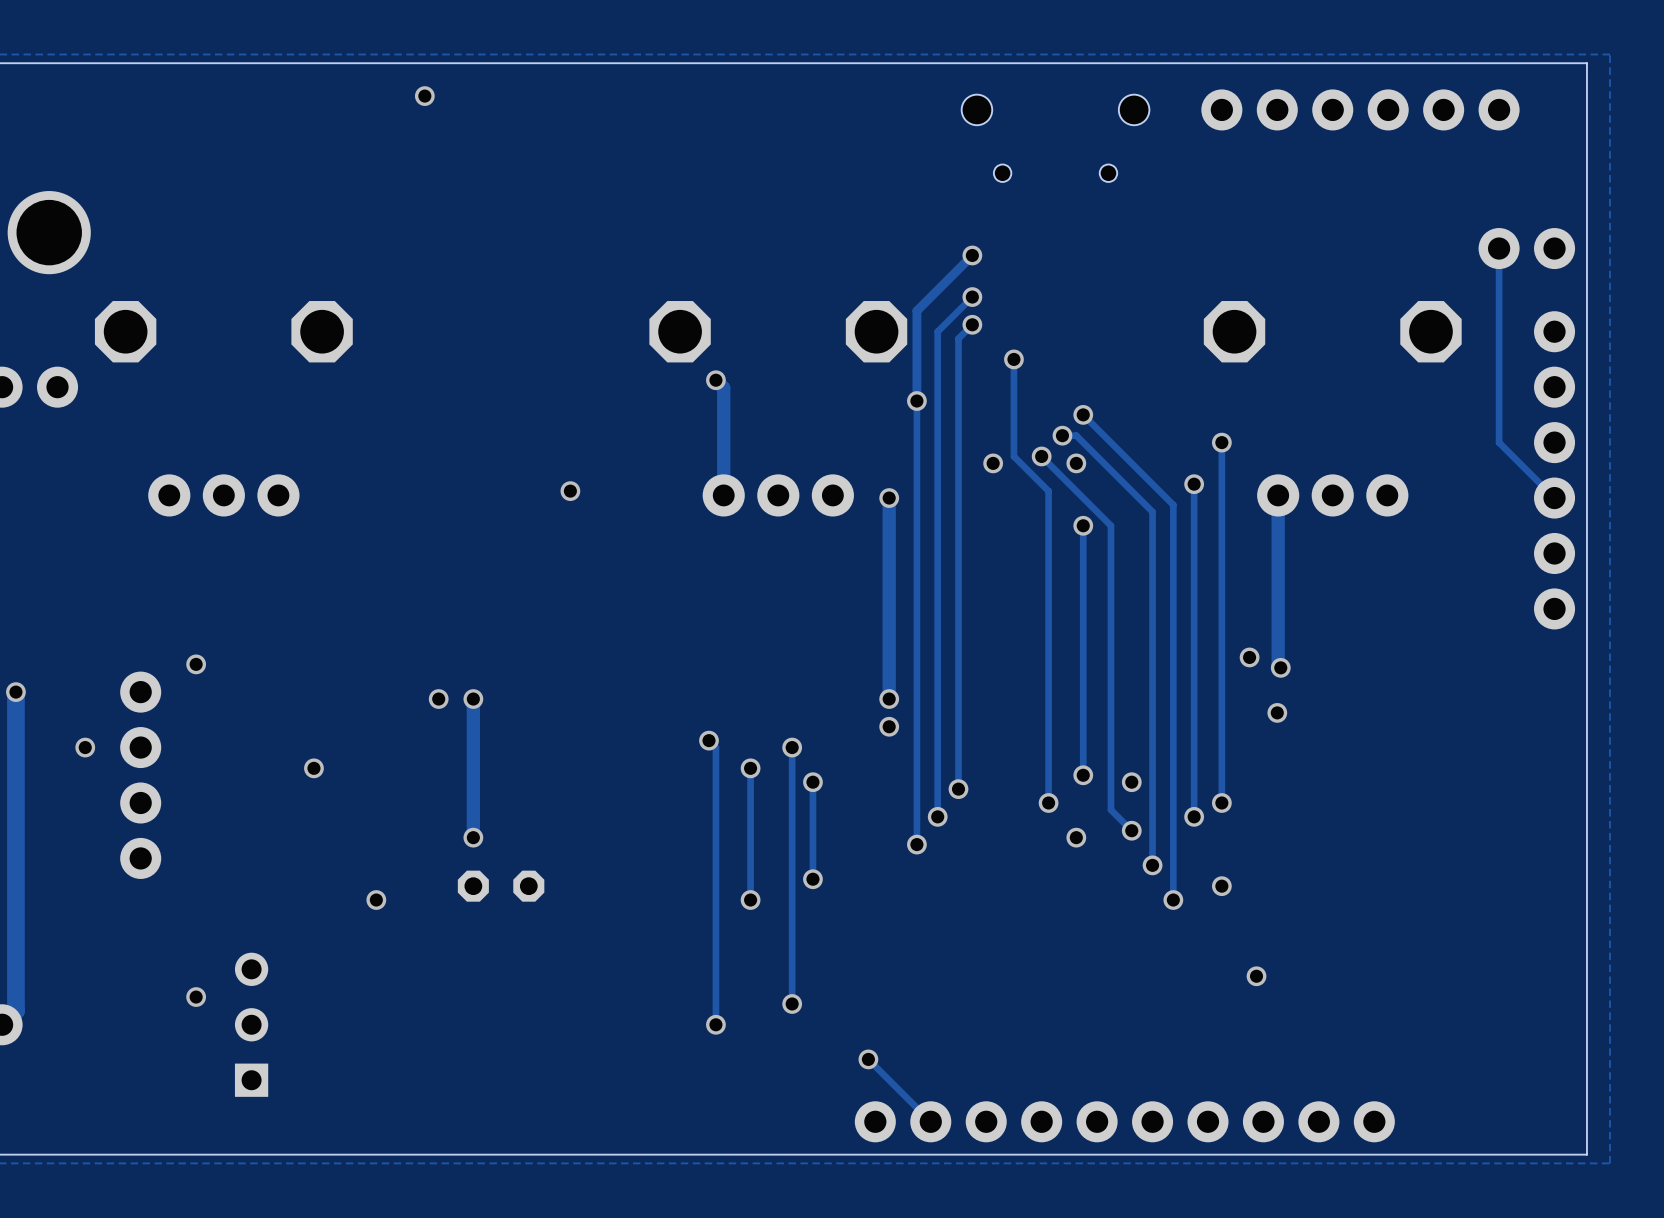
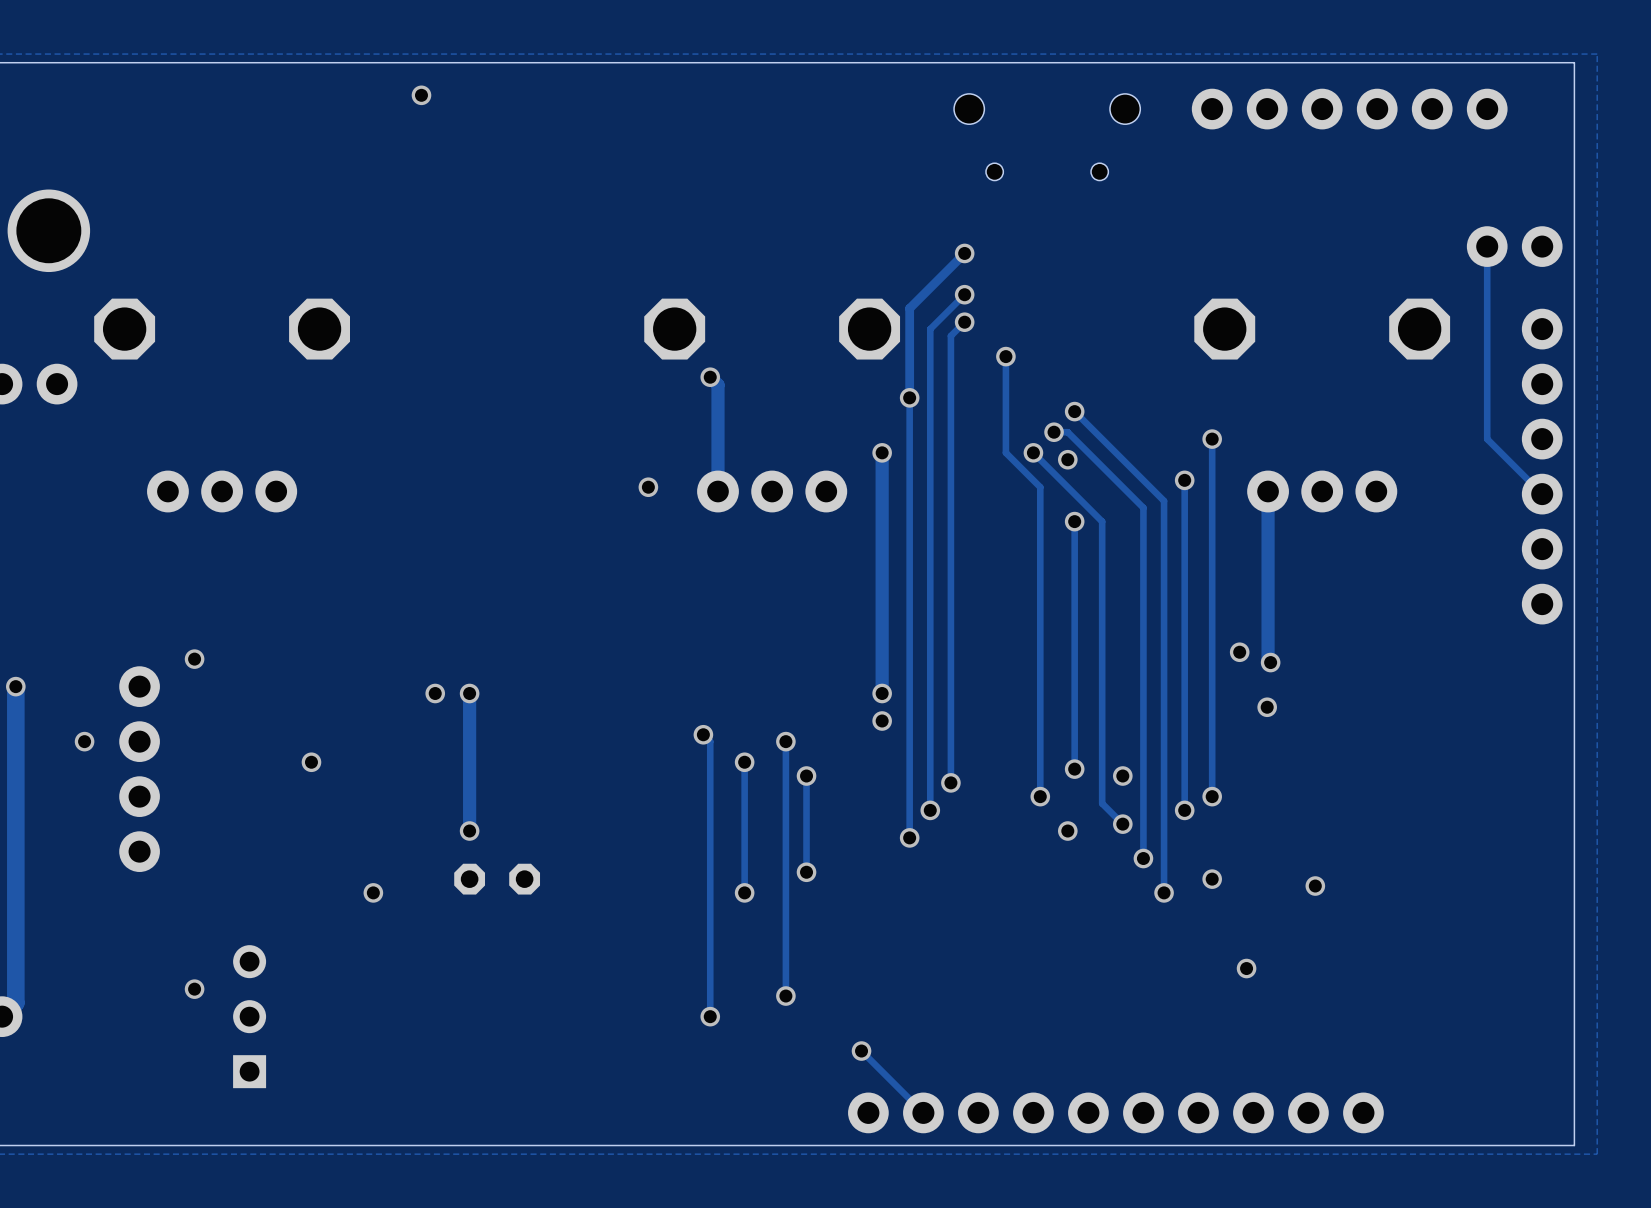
track: none -> (882, 452) (882, 494)
via: (993, 463) -> none
via position: (570, 491) -> (648, 487)
via position: (889, 498) -> (882, 452)
via: none -> (1315, 886)

